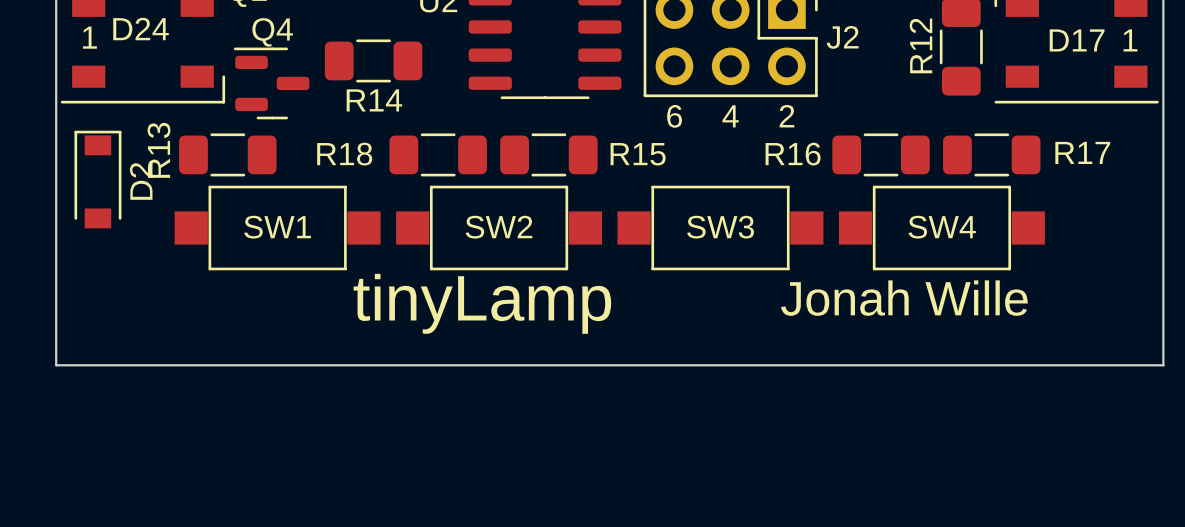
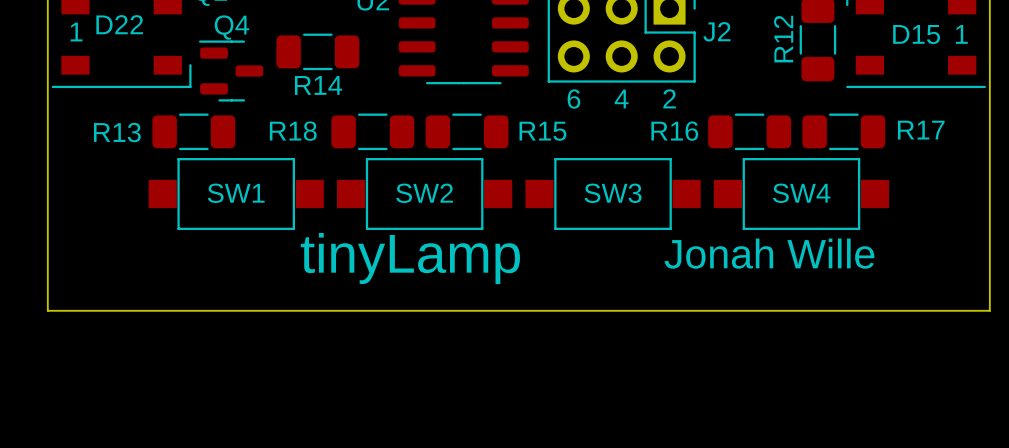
D24 name: D24 (140, 29) -> D22 (119, 24)
D17 name: D17 (1077, 40) -> D15 (916, 34)
R13 name rotation: 0° (158, 150) -> 90° clockwise (117, 132)
D2: (97, 179) -> none

